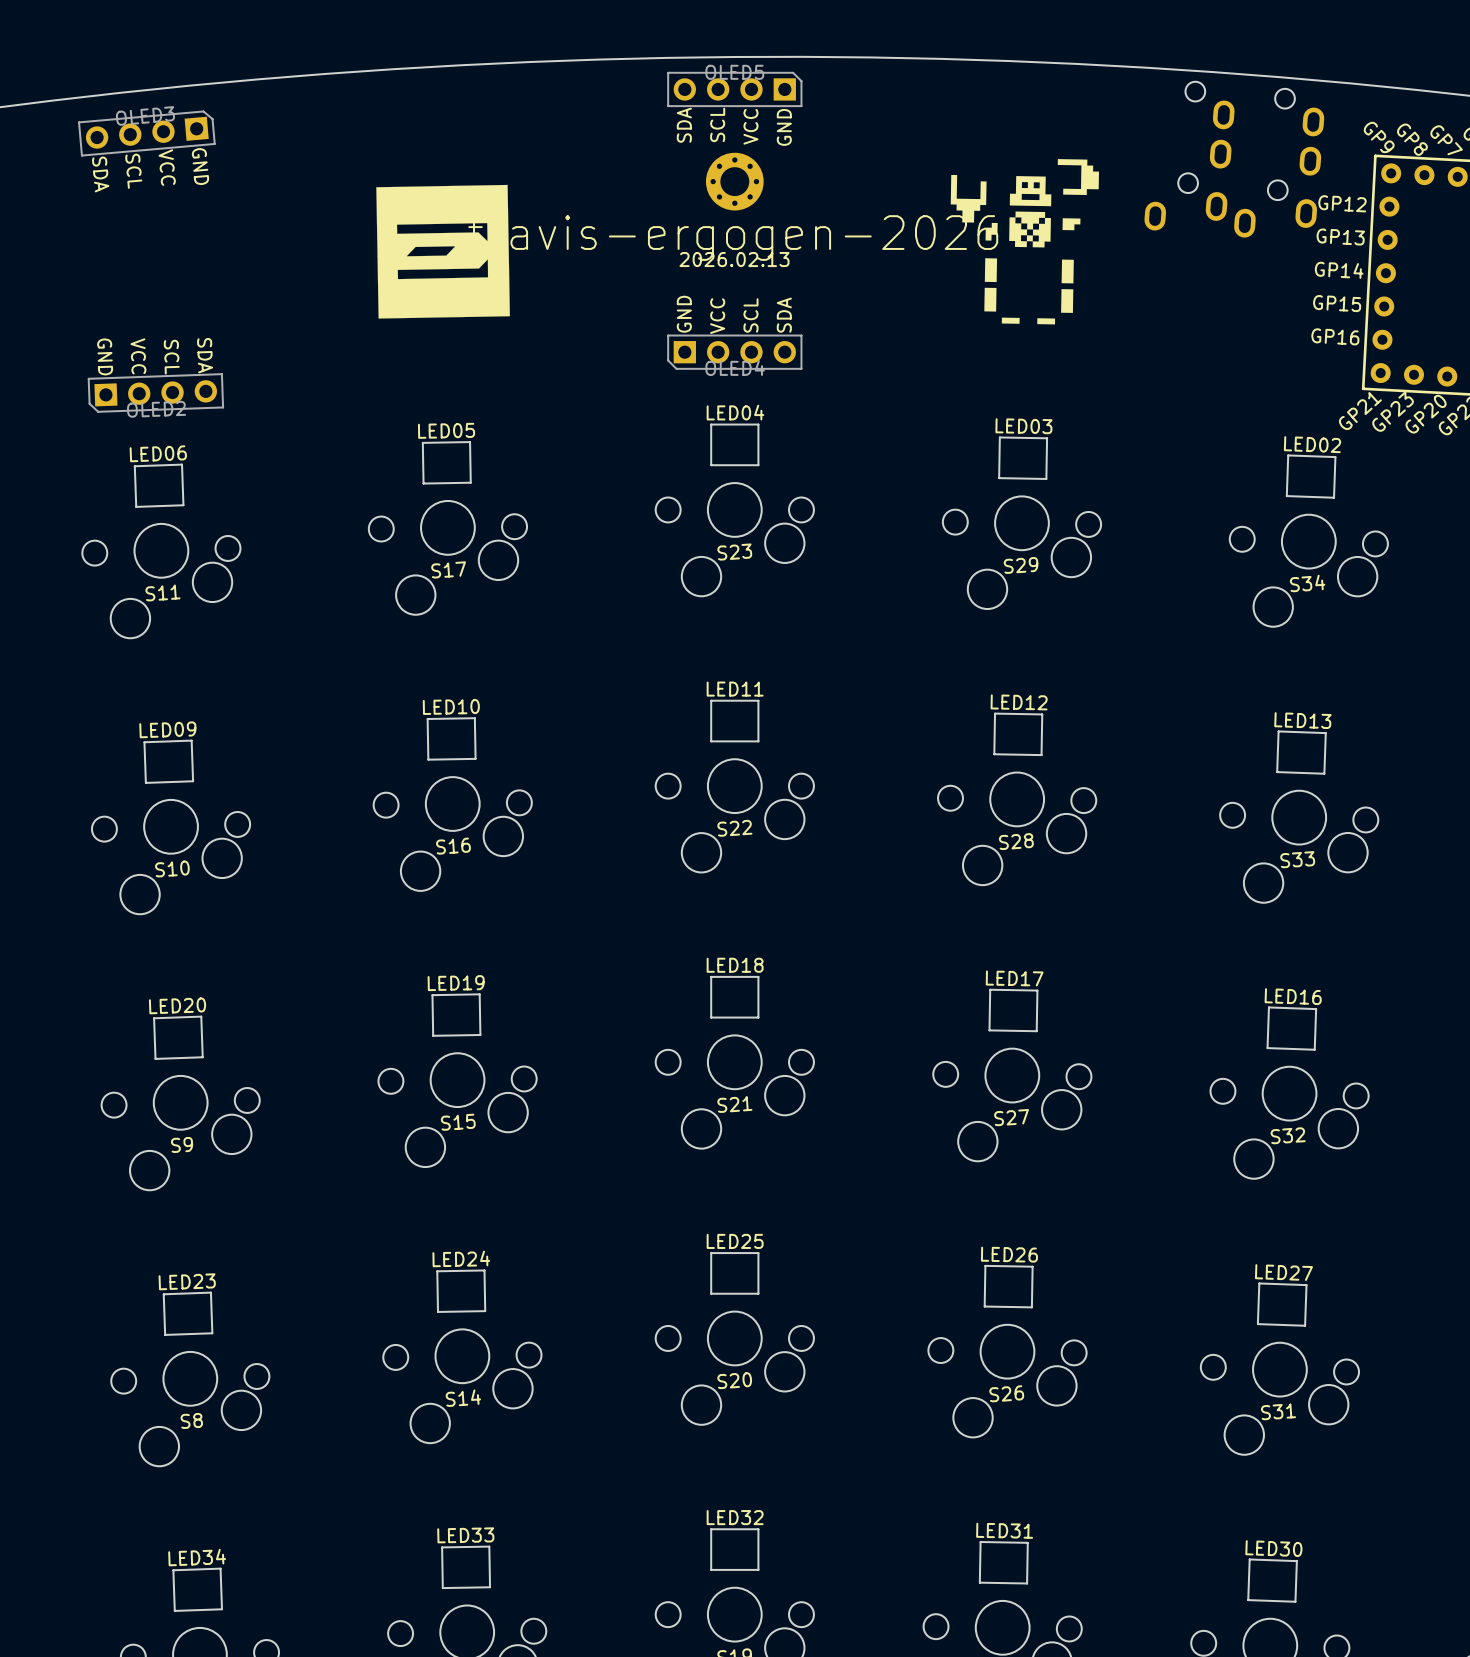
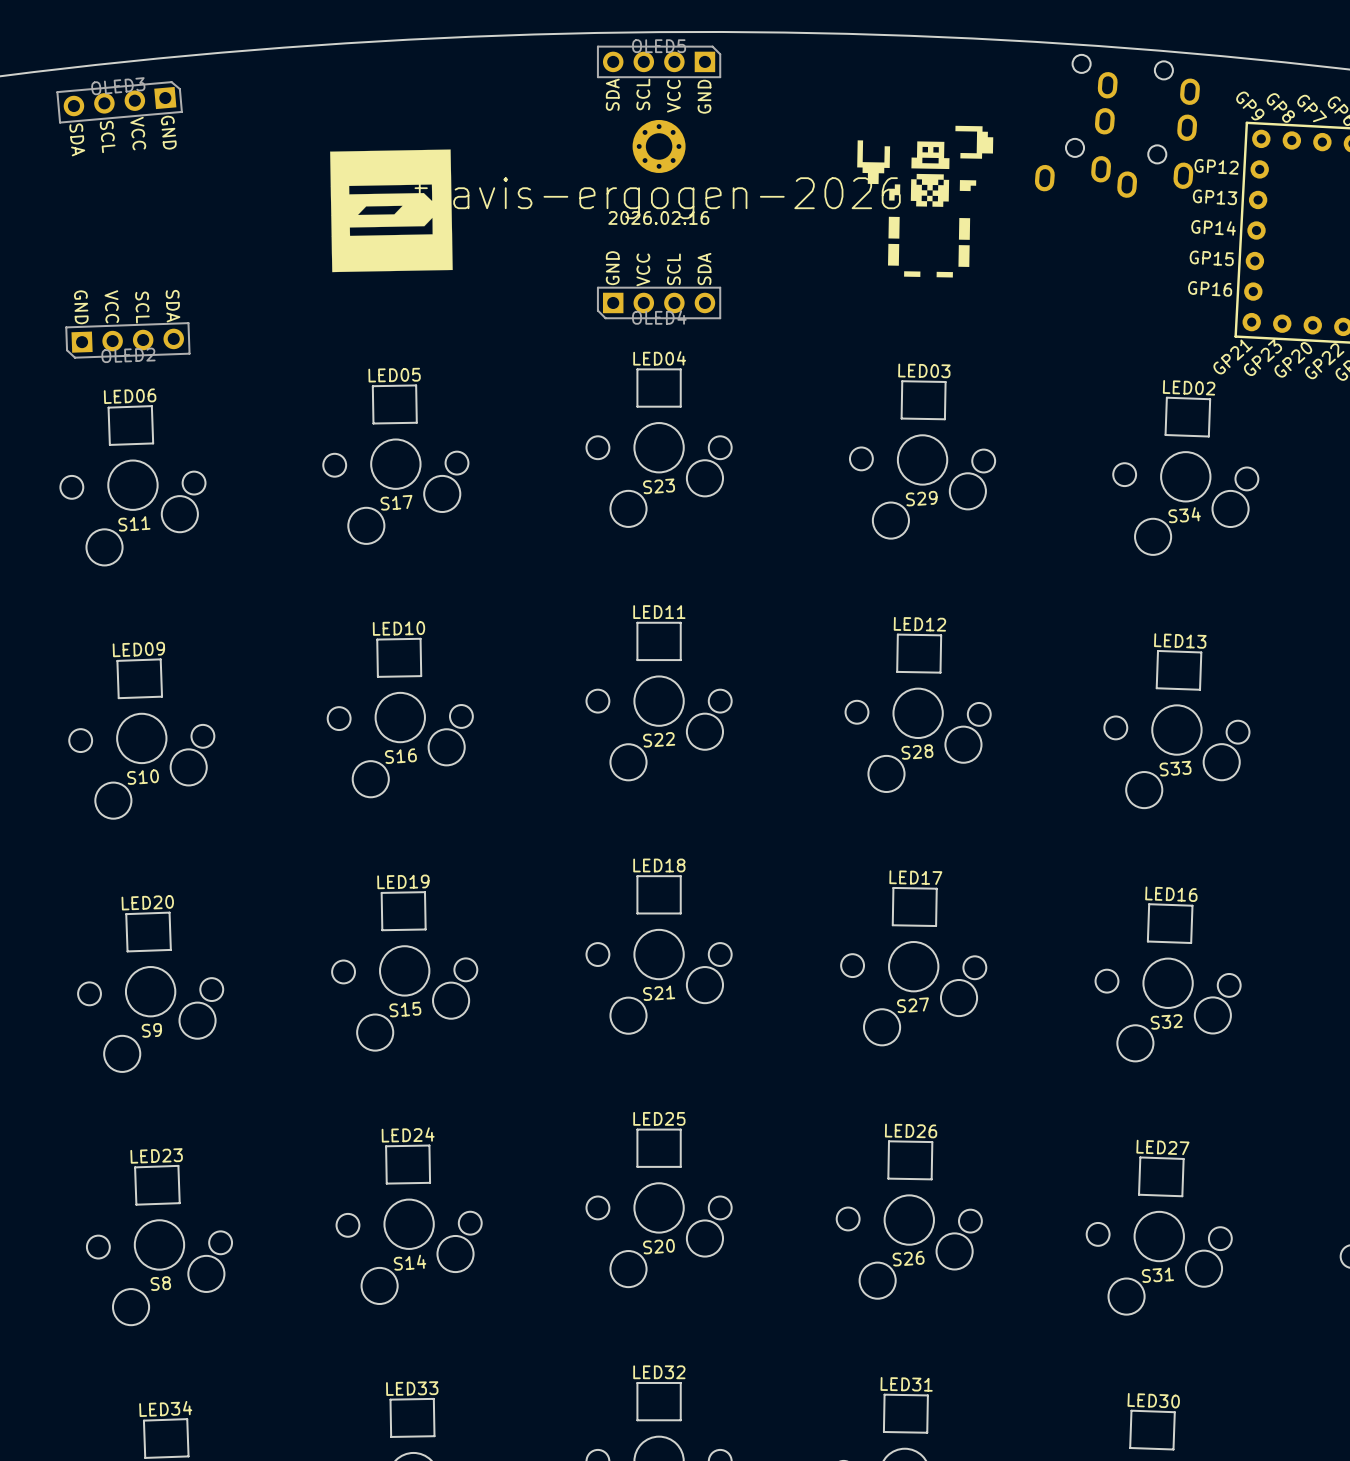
text: 2026.02.13 (734, 259) -> 2026.02.16 (658, 217)

